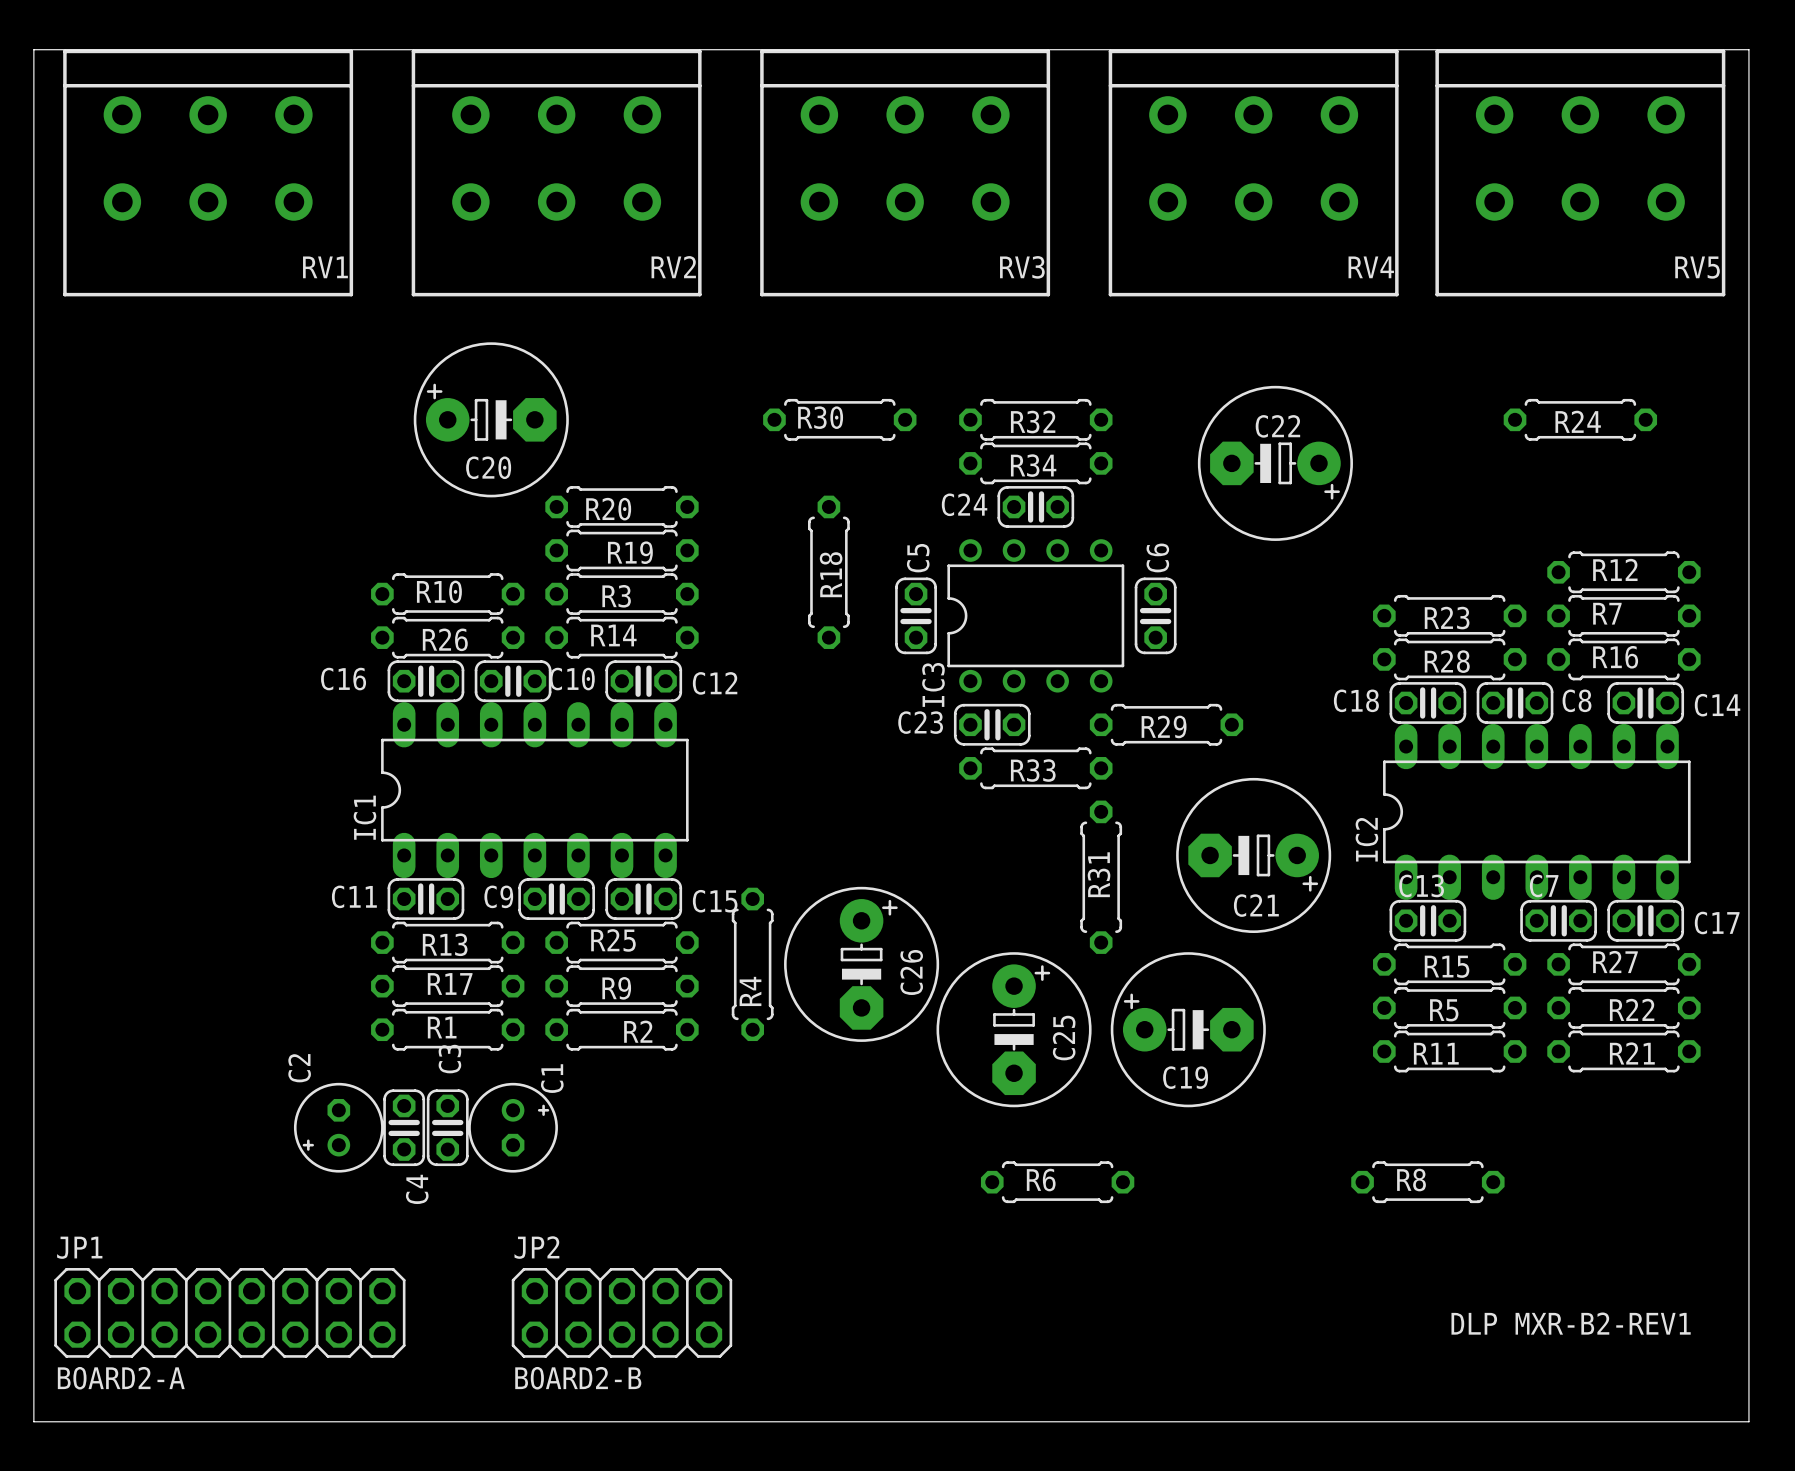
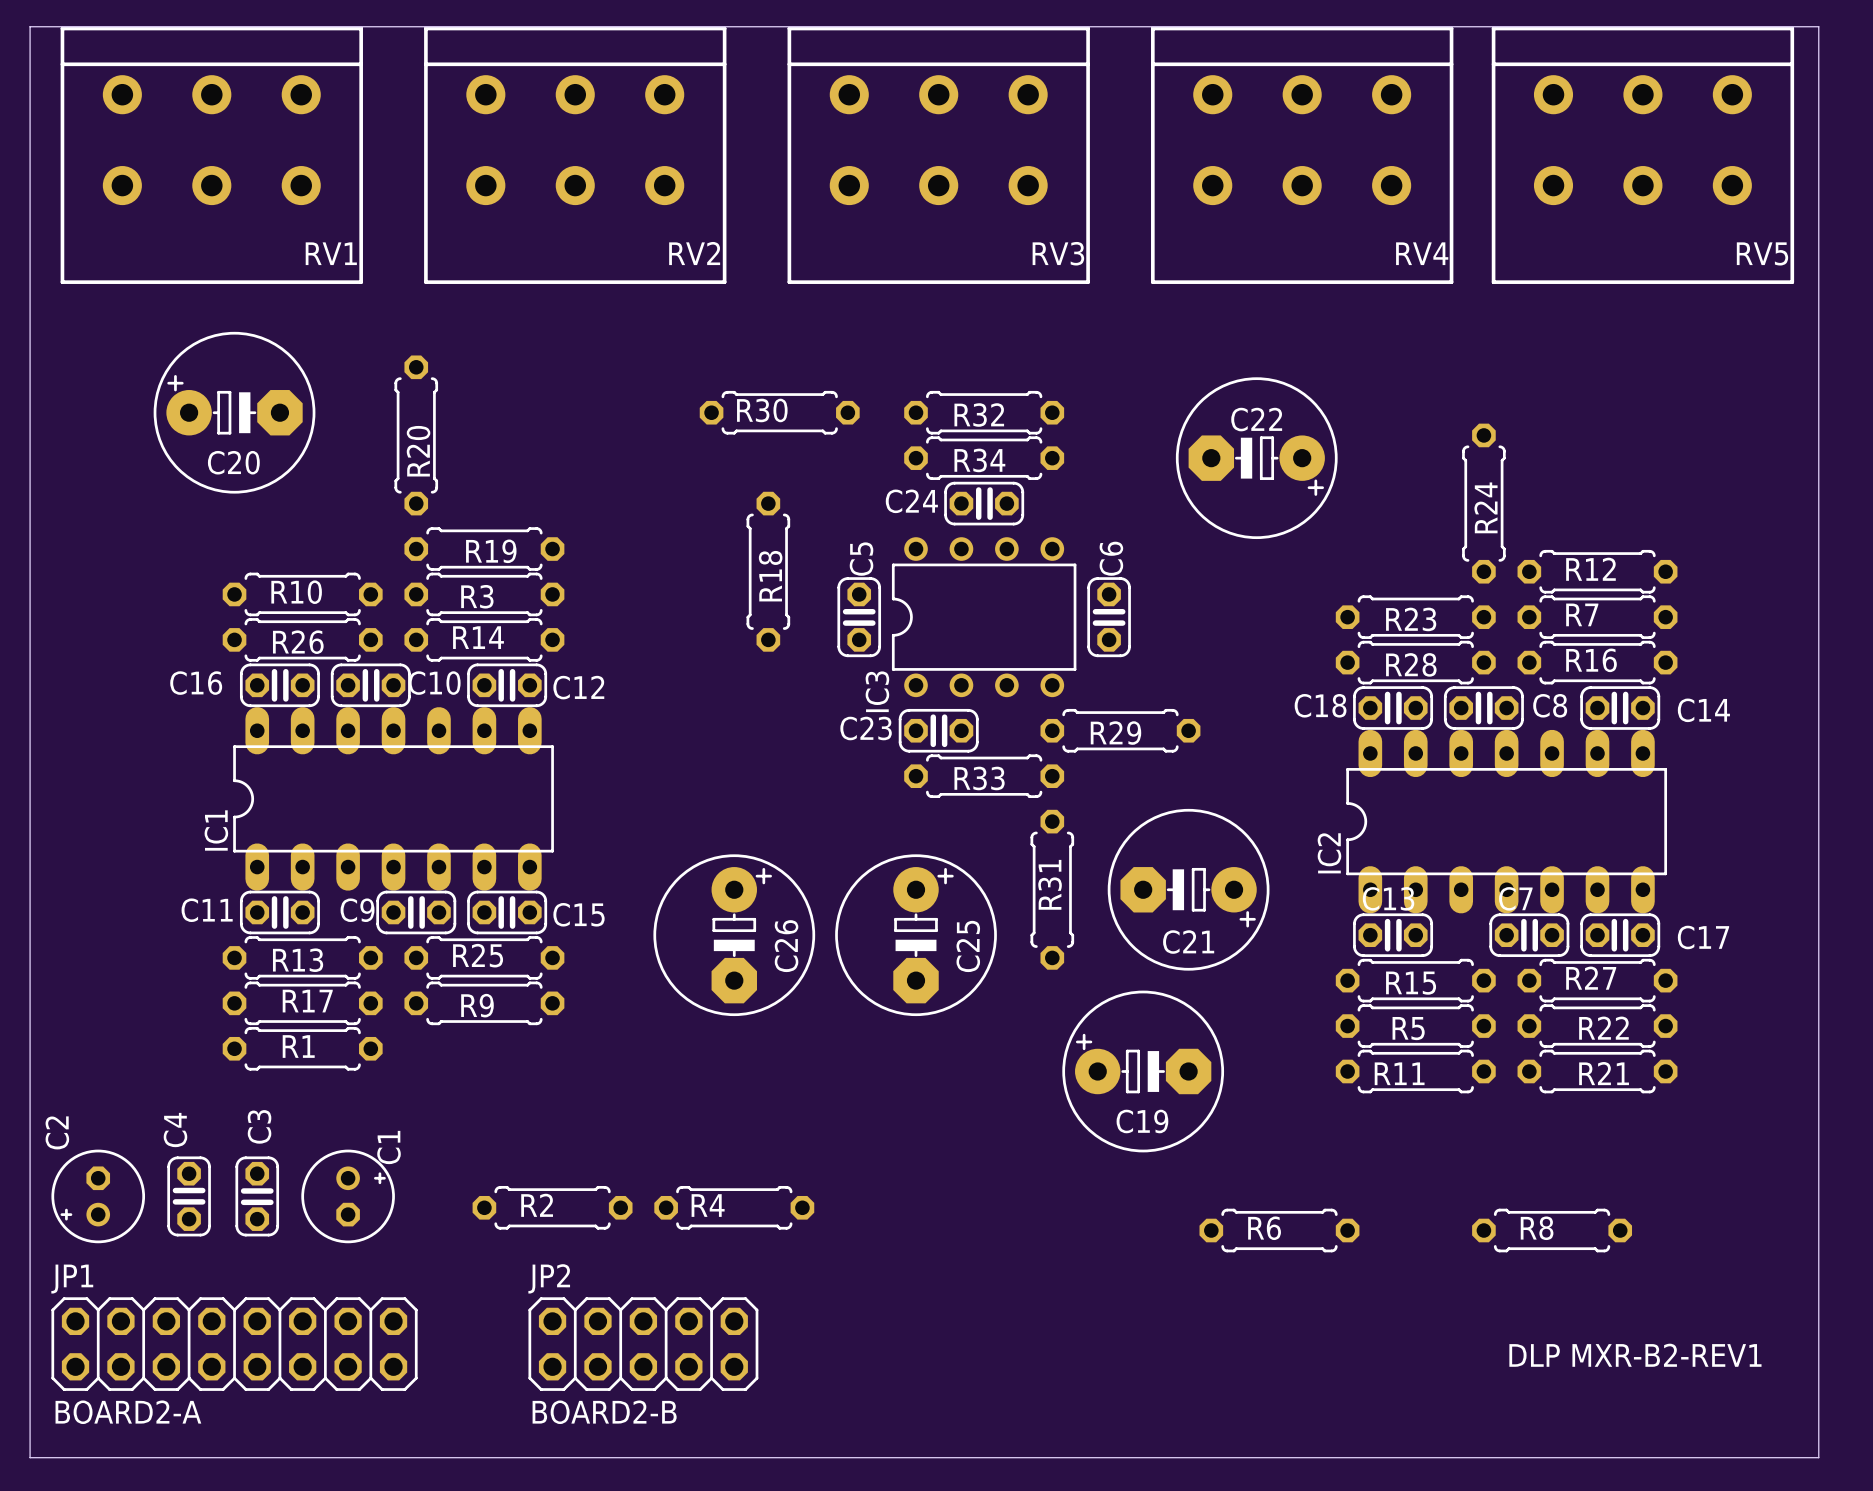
C20 position: (491, 419) -> (234, 412)
R30 position: (839, 419) -> (779, 412)
R32 position: (1035, 419) -> (984, 412)
R24 rotation: 0° (1580, 419) -> 90° clockwise (1483, 503)
R24 position: (1580, 419) -> (1483, 503)
R34 position: (1035, 463) -> (984, 458)
C22 position: (1275, 463) -> (1256, 458)
R20 rotation: 0° (621, 506) -> 90° clockwise (416, 435)
R20 position: (621, 506) -> (416, 435)
C24 position: (1035, 506) -> (984, 503)
R19 position: (621, 550) -> (484, 549)
R18 position: (828, 572) -> (768, 571)
R12 position: (1623, 572) -> (1597, 571)
R10 position: (447, 594) -> (302, 594)
R3 position: (621, 594) -> (484, 594)
C5 position: (916, 615) -> (859, 617)
IC3 position: (1035, 615) -> (984, 617)
C6 position: (1155, 615) -> (1109, 617)
R23 position: (1449, 615) -> (1415, 617)
R7 position: (1623, 615) -> (1597, 617)
R26 position: (447, 637) -> (302, 639)
R14 position: (621, 637) -> (484, 639)
R28 position: (1449, 659) -> (1415, 662)
R16 position: (1623, 659) -> (1597, 662)
C16 position: (425, 681) -> (279, 685)
C10 position: (513, 681) -> (370, 685)
C12 position: (643, 681) -> (507, 685)
C18 name: C18 (1356, 700) -> C8 (1550, 705)
C18: none -> (1393, 708)
C8: (1515, 702) -> none
C14 position: (1645, 702) -> (1620, 708)
C14 name position: C14 (1717, 705) -> C14 (1703, 710)
C23 position: (992, 724) -> (938, 730)
R29 position: (1166, 724) -> (1120, 730)
R33 position: (1035, 768) -> (984, 776)
IC1 position: (534, 790) -> (393, 798)
IC2 position: (1536, 811) -> (1506, 821)
C21 position: (1253, 855) -> (1188, 889)
R31 position: (1101, 877) -> (1052, 889)
C11 position: (425, 899) -> (279, 912)
C9 position: (556, 899) -> (416, 912)
C15 position: (643, 899) -> (507, 912)
C13 position: (1427, 920) -> (1393, 935)
C7 position: (1558, 920) -> (1529, 935)
C17 position: (1645, 920) -> (1620, 935)
C17 name position: C17 (1717, 923) -> C17 (1703, 937)
R13 position: (447, 942) -> (302, 957)
R25 position: (621, 942) -> (484, 957)
R4 rotation: 0° (752, 964) -> 90° clockwise (734, 1207)
R4 position: (752, 964) -> (734, 1207)
C26 position: (861, 964) -> (734, 935)
R15 position: (1449, 964) -> (1415, 980)
R27 position: (1623, 964) -> (1597, 980)
R17 position: (447, 986) -> (302, 1003)
R9 position: (621, 986) -> (484, 1003)
R5 position: (1449, 1007) -> (1415, 1026)
R22 position: (1623, 1007) -> (1597, 1026)
R1 position: (447, 1029) -> (302, 1048)
R2 position: (621, 1029) -> (552, 1207)
C25 position: (1014, 1029) -> (916, 935)
C19 position: (1188, 1029) -> (1143, 1071)
R2 name position: R2 (638, 1031) -> R2 (537, 1205)
R11 position: (1449, 1051) -> (1415, 1071)
R21 position: (1623, 1051) -> (1597, 1071)
C2 position: (338, 1127) -> (98, 1196)
C4 rotation: 0° (404, 1127) -> 180° (189, 1196)
C4 position: (404, 1127) -> (189, 1196)
C3 position: (447, 1127) -> (257, 1196)
C1 position: (513, 1127) -> (348, 1196)
R6 position: (1057, 1182) -> (1279, 1230)
R8 position: (1427, 1182) -> (1552, 1230)

